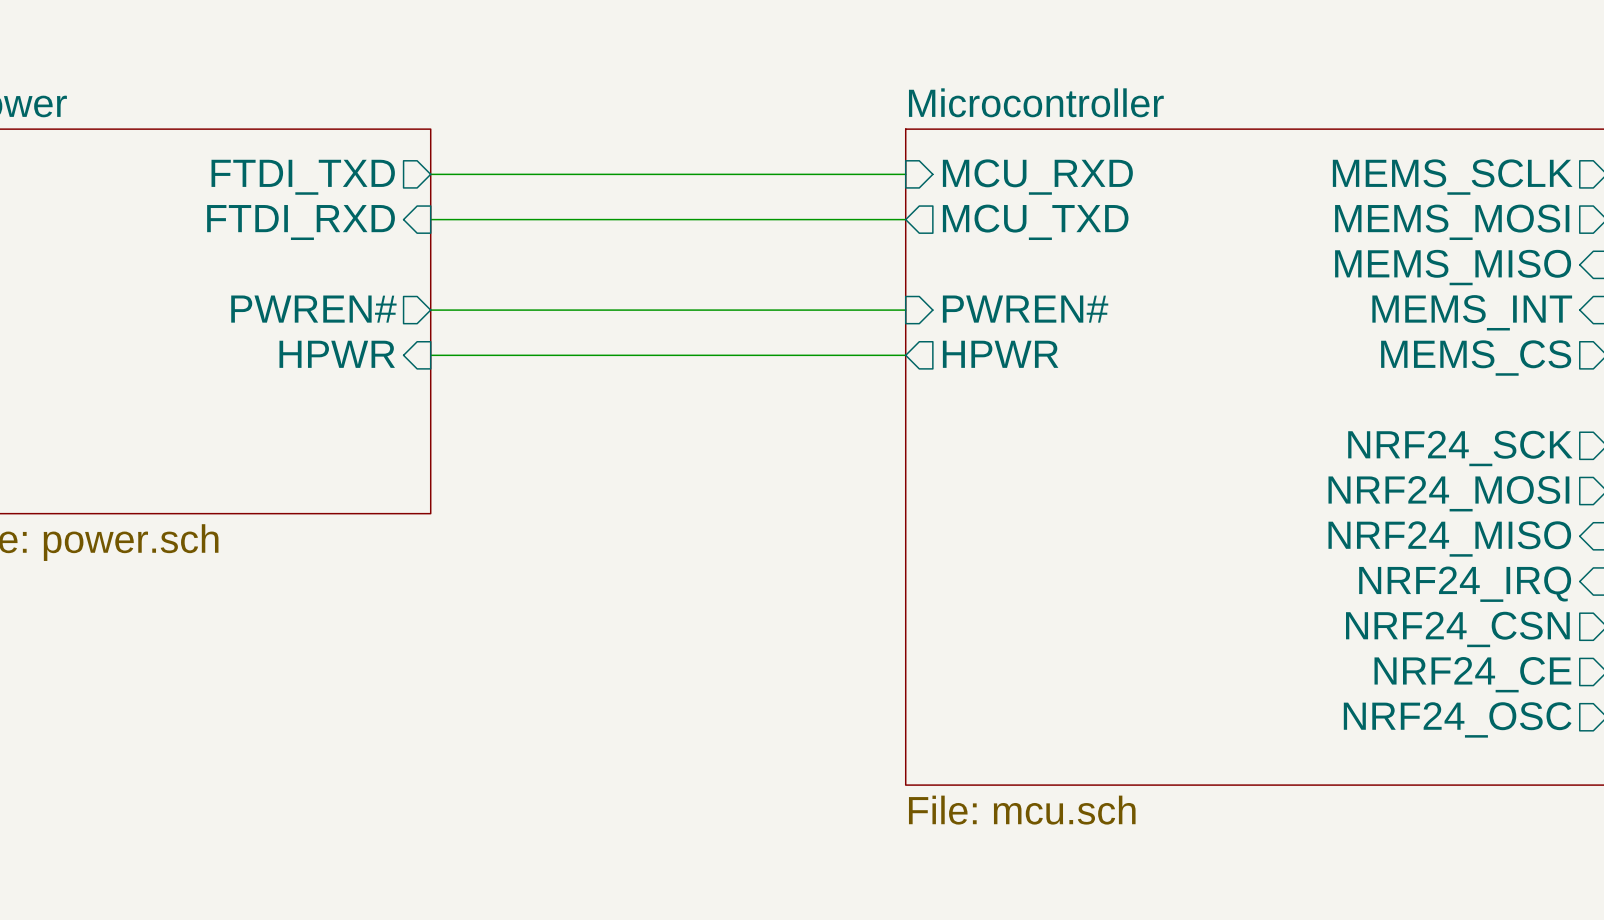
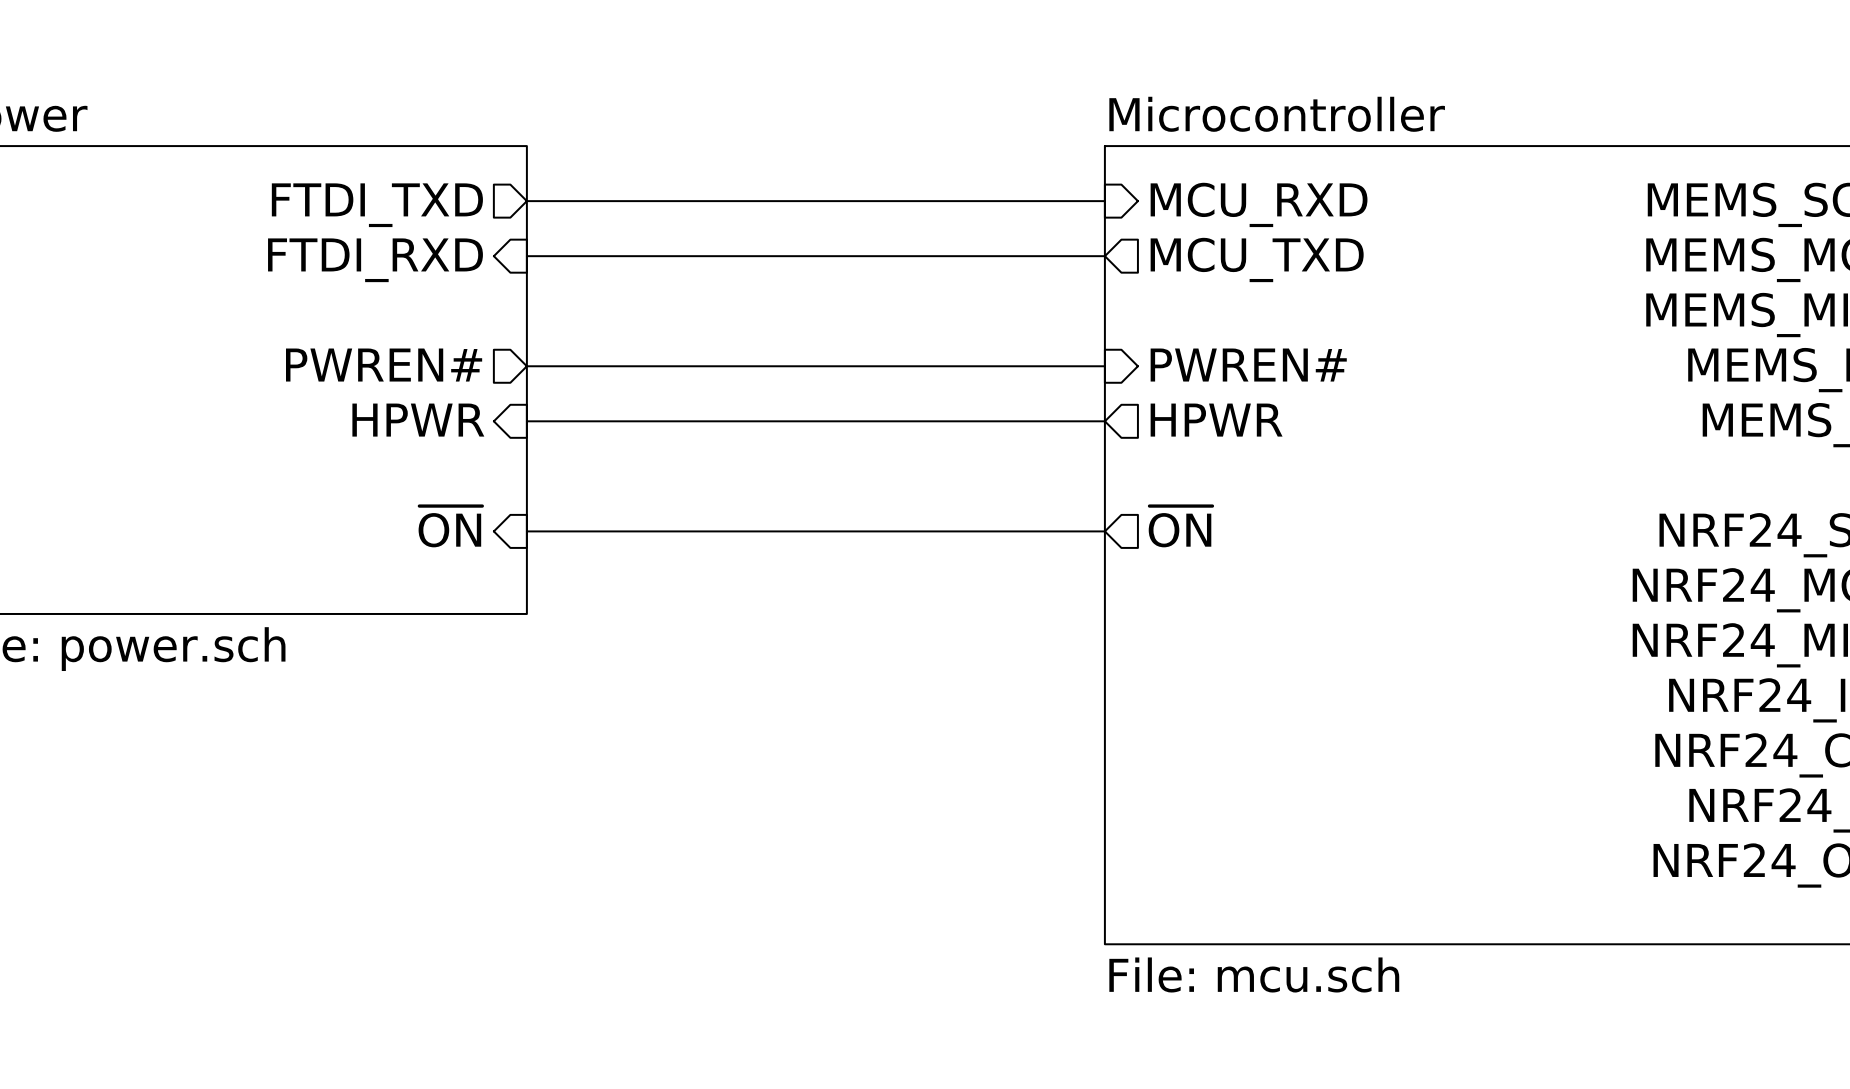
sheet pin: none -> ~{ON} (450, 526)
sheet pin: none -> ~{ON} (1180, 526)
wire: none -> (526, 531) (1104, 531)

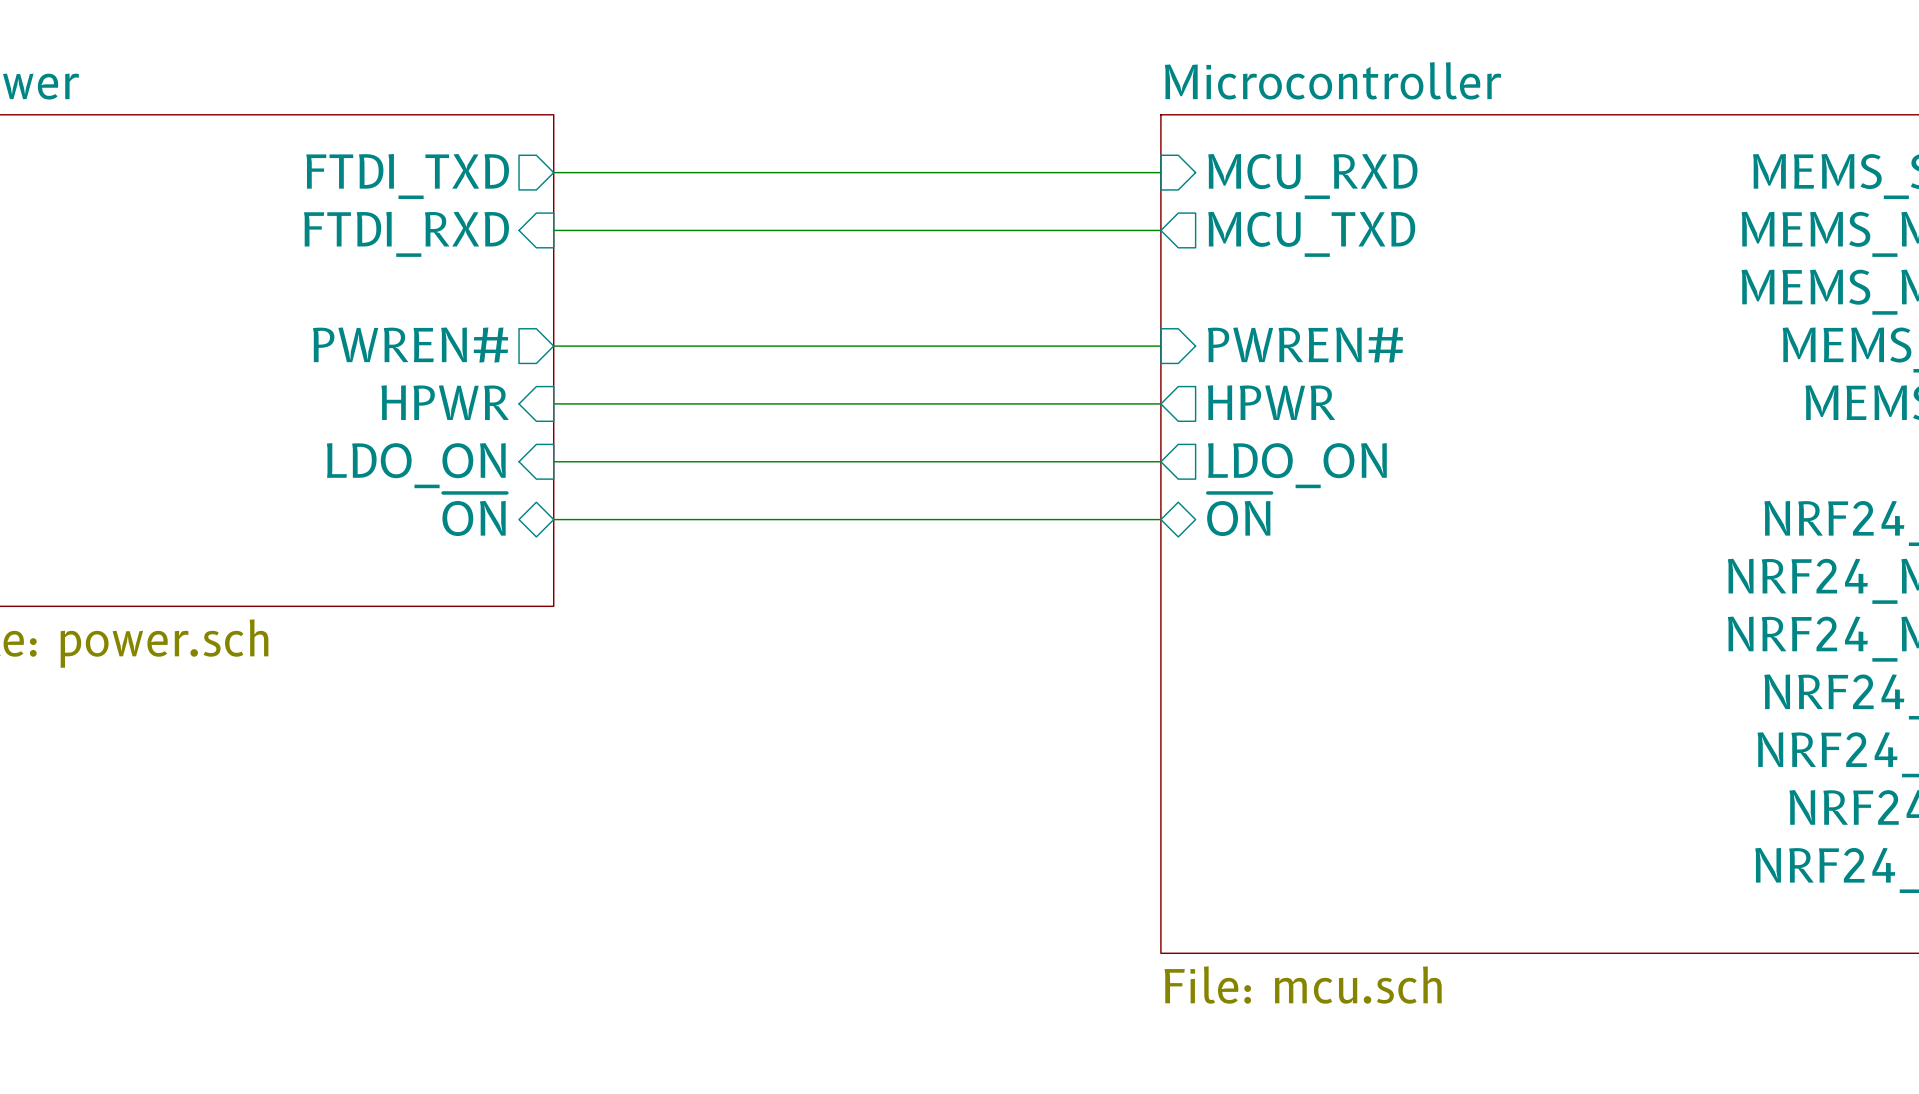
wire: none -> (553, 461) (1160, 461)
sheet pin: none -> LDO_ON (416, 465)
sheet pin: none -> LDO_ON (1297, 465)
sheet pin shape: input (450, 526) -> bidirectional (474, 514)
sheet pin shape: output (1180, 526) -> bidirectional (1239, 514)

